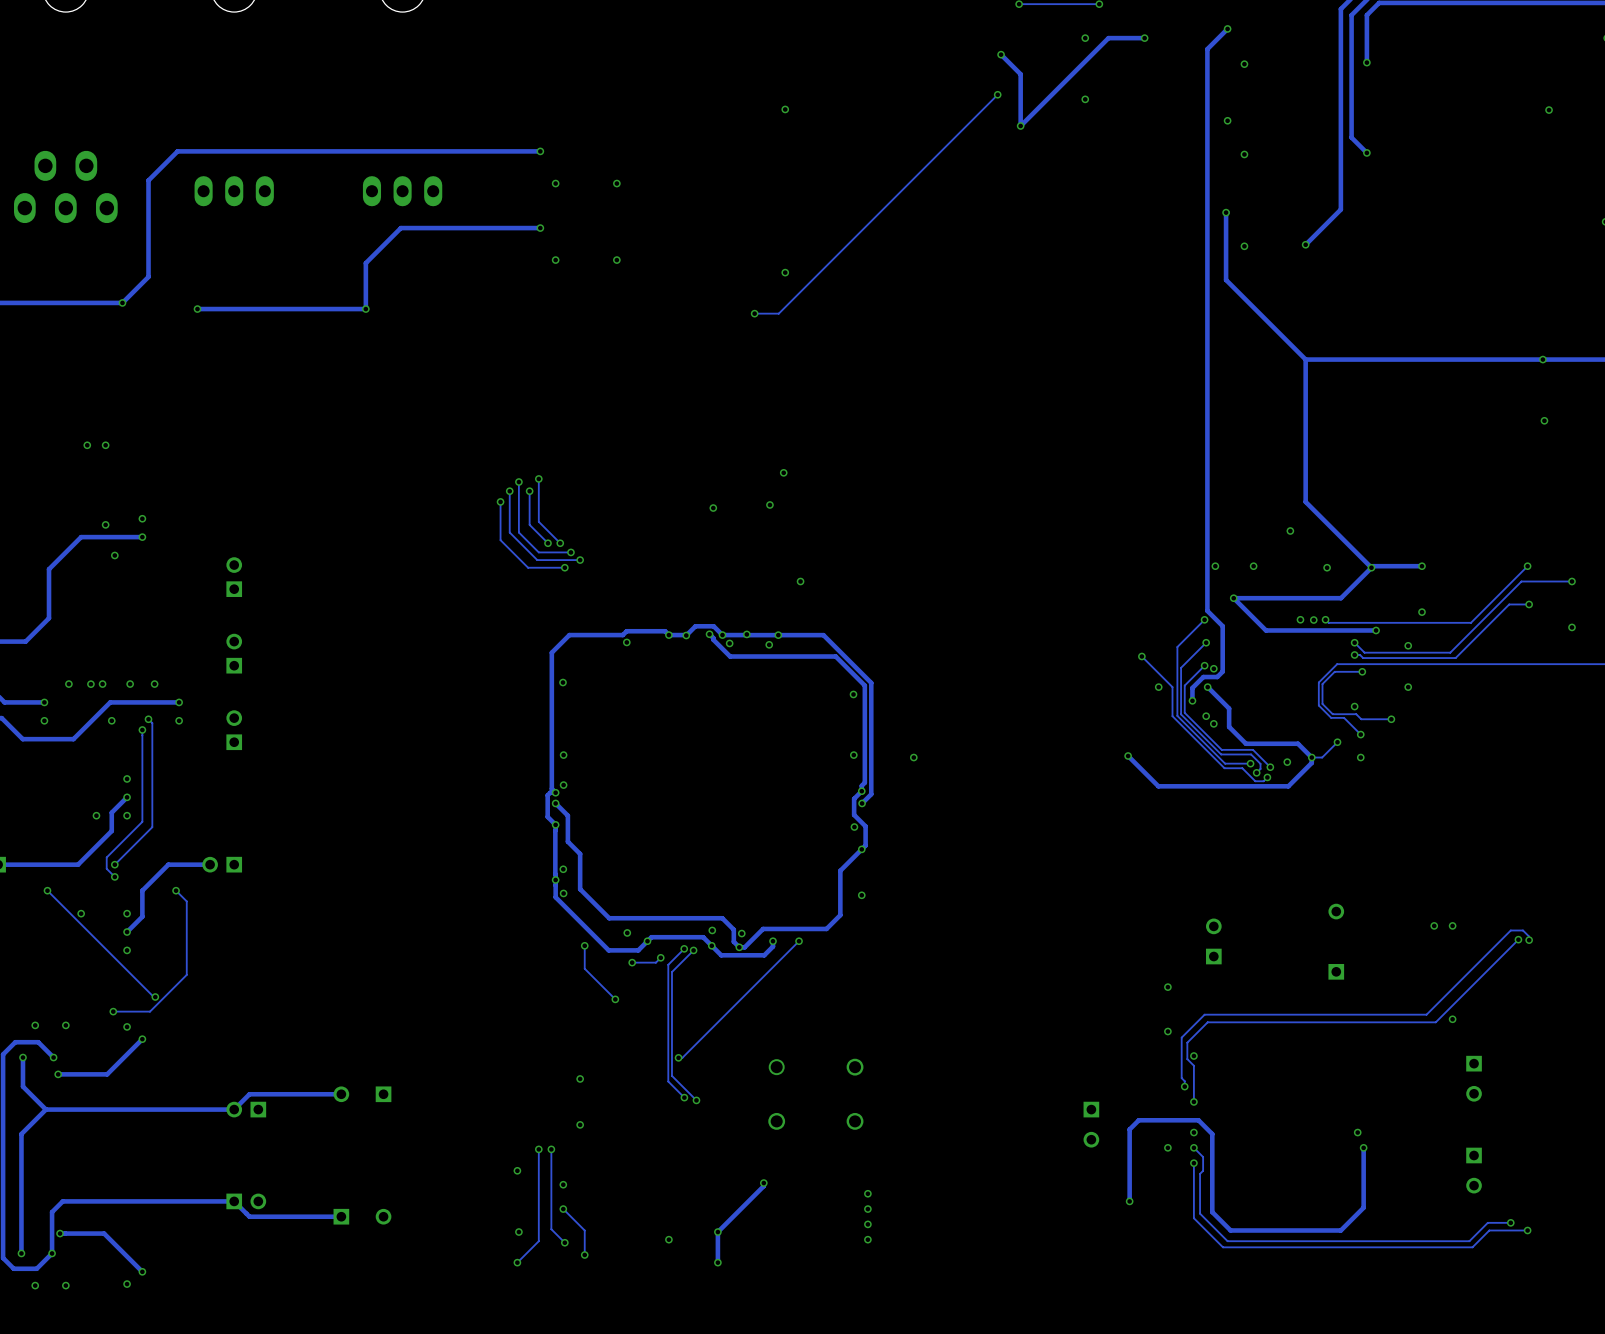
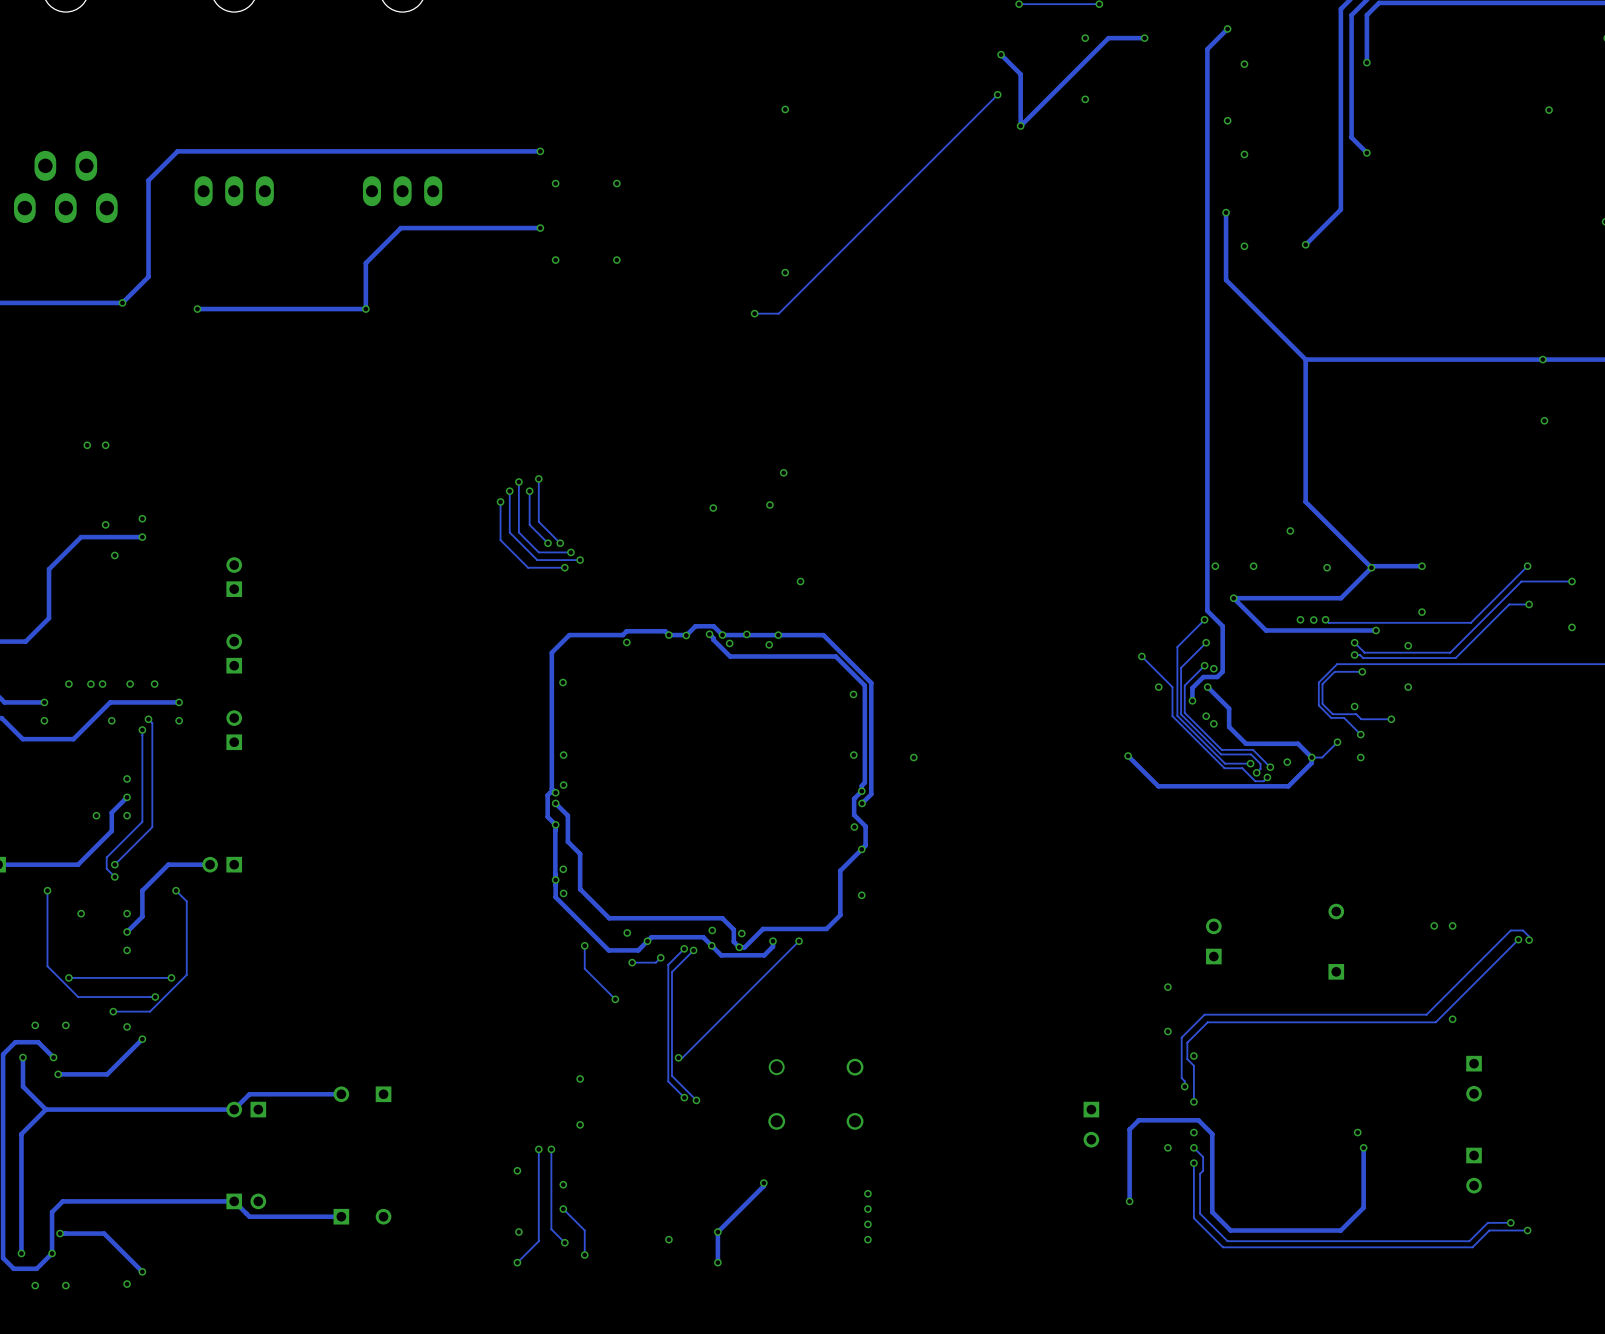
track: (47, 890) (153, 997) -> (47, 890) (47, 966) (78, 997) (153, 997)
via: none -> (68, 977)
track: none -> (171, 977) (68, 977)
via: none -> (171, 977)

